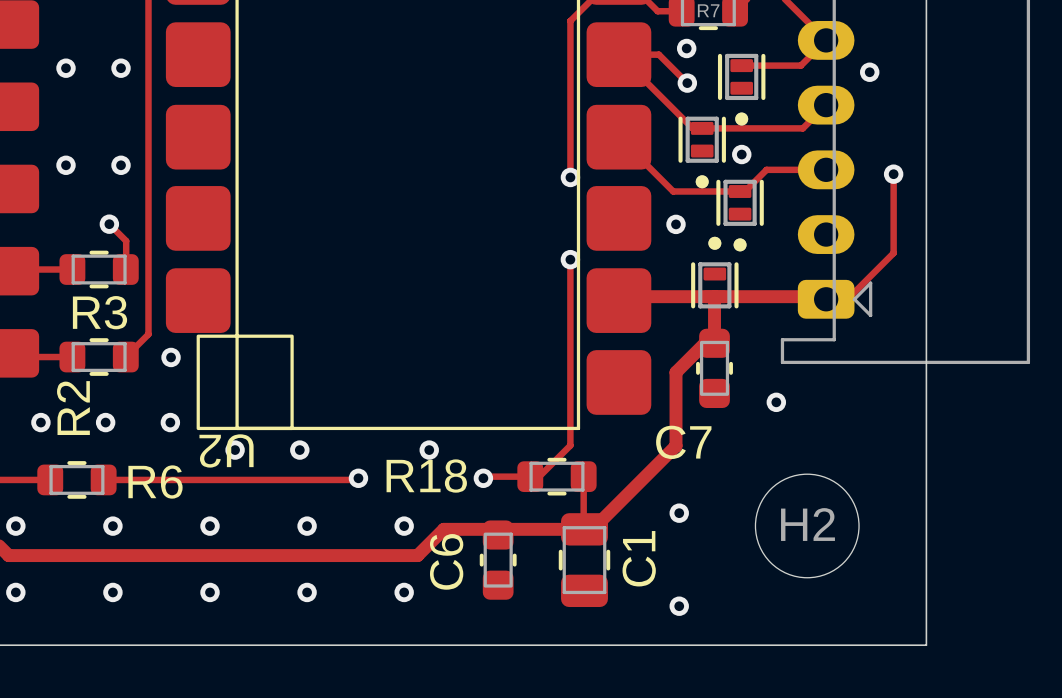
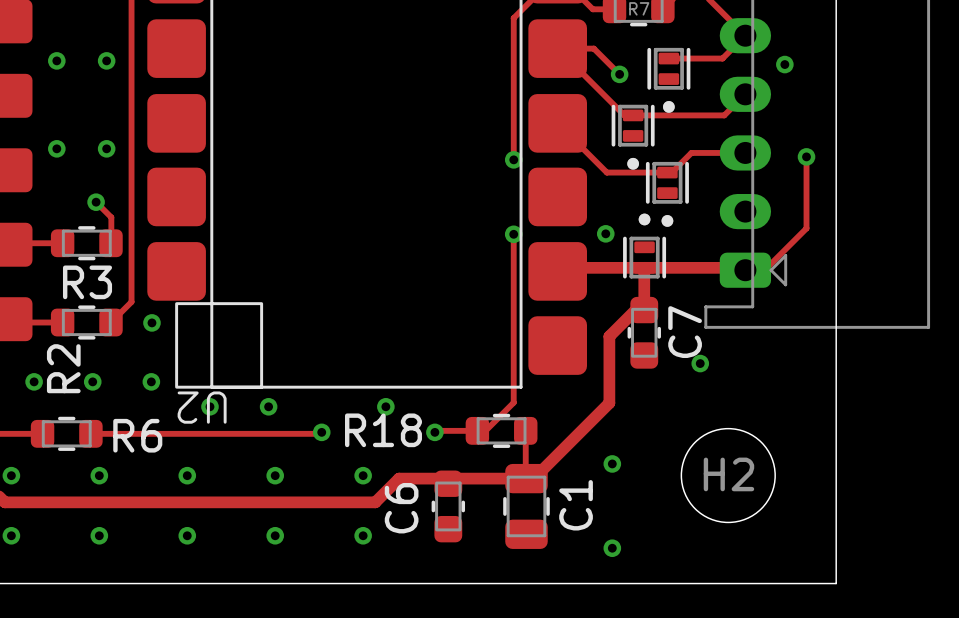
via: (686, 48) -> none
via: (741, 154) -> none
via position: (676, 224) -> (605, 233)
C7 name rotation: 0° (683, 442) -> 90° counterclockwise (685, 332)
C7 name position: C7 (683, 442) -> C7 (685, 332)

